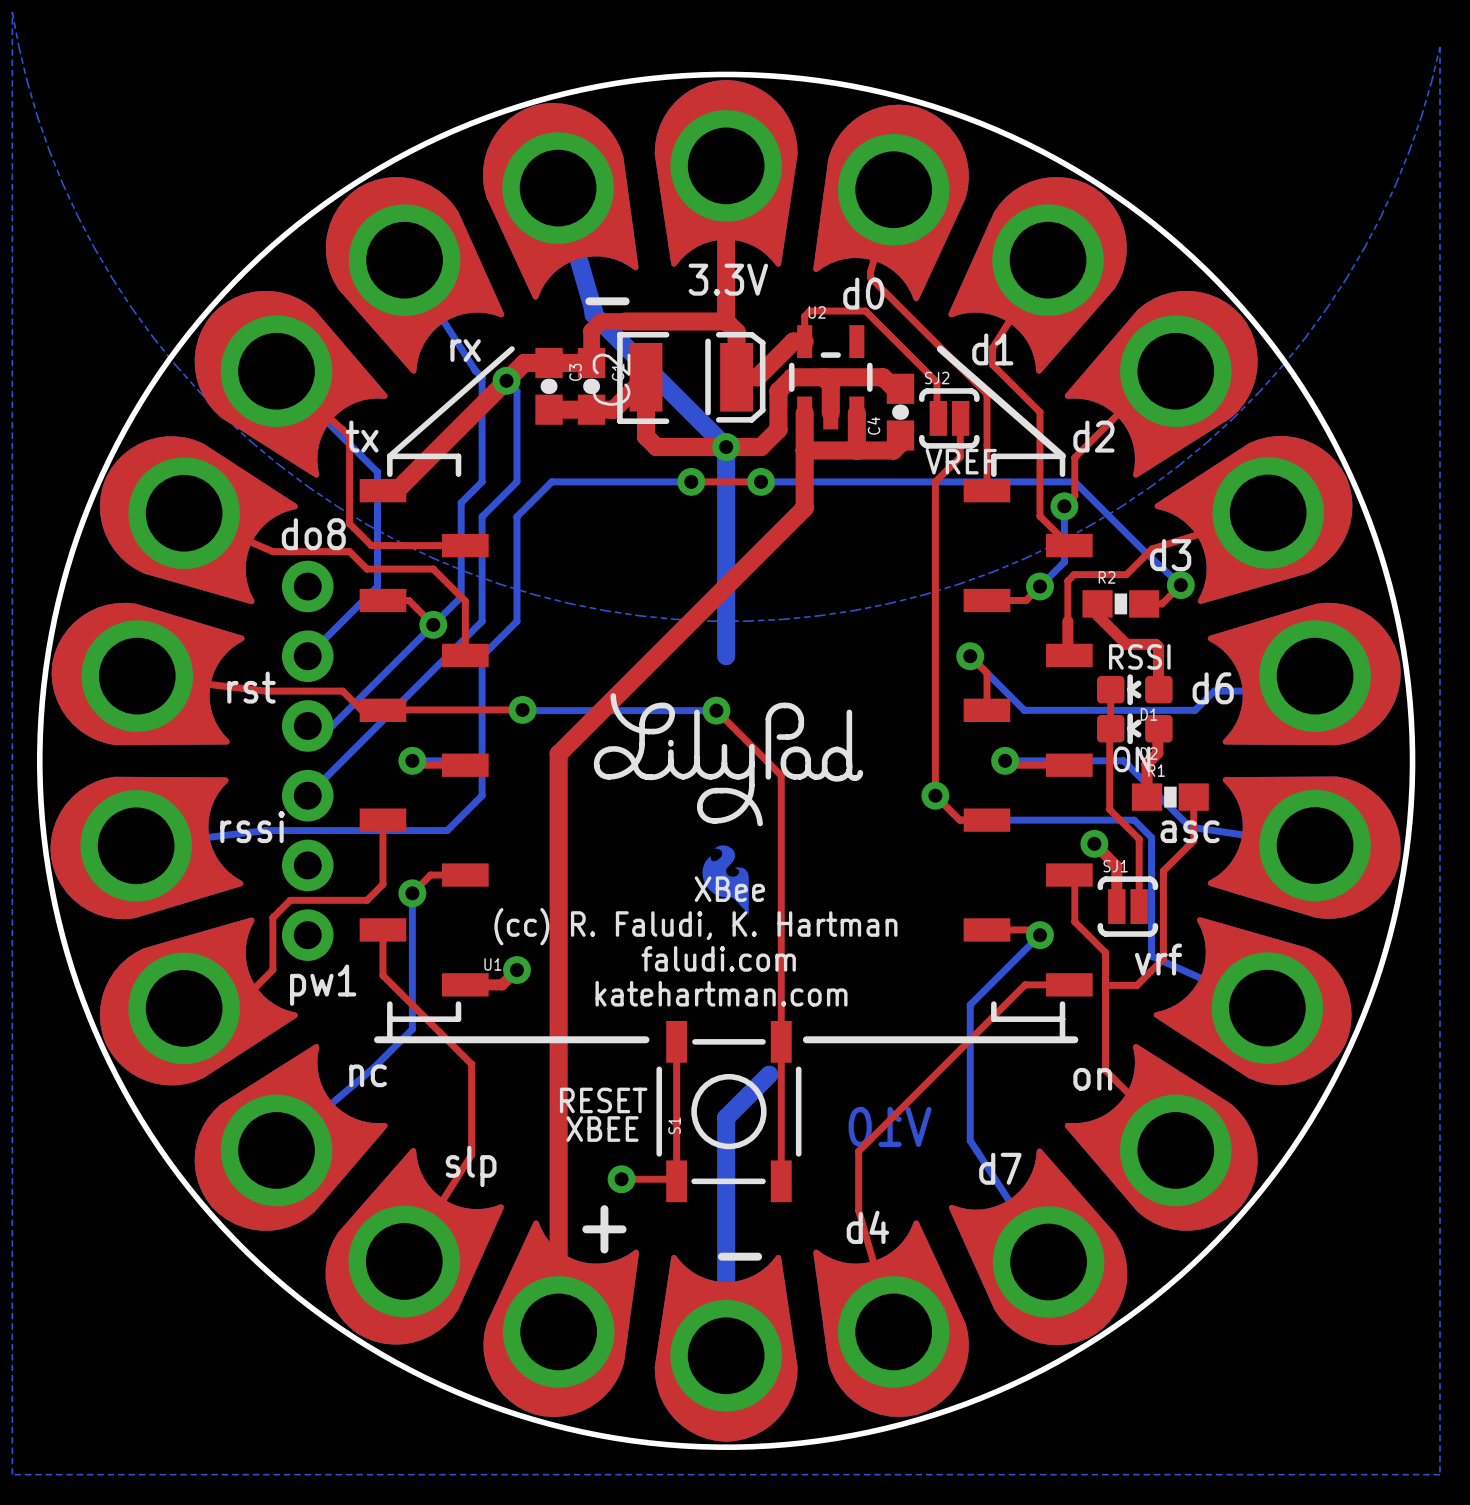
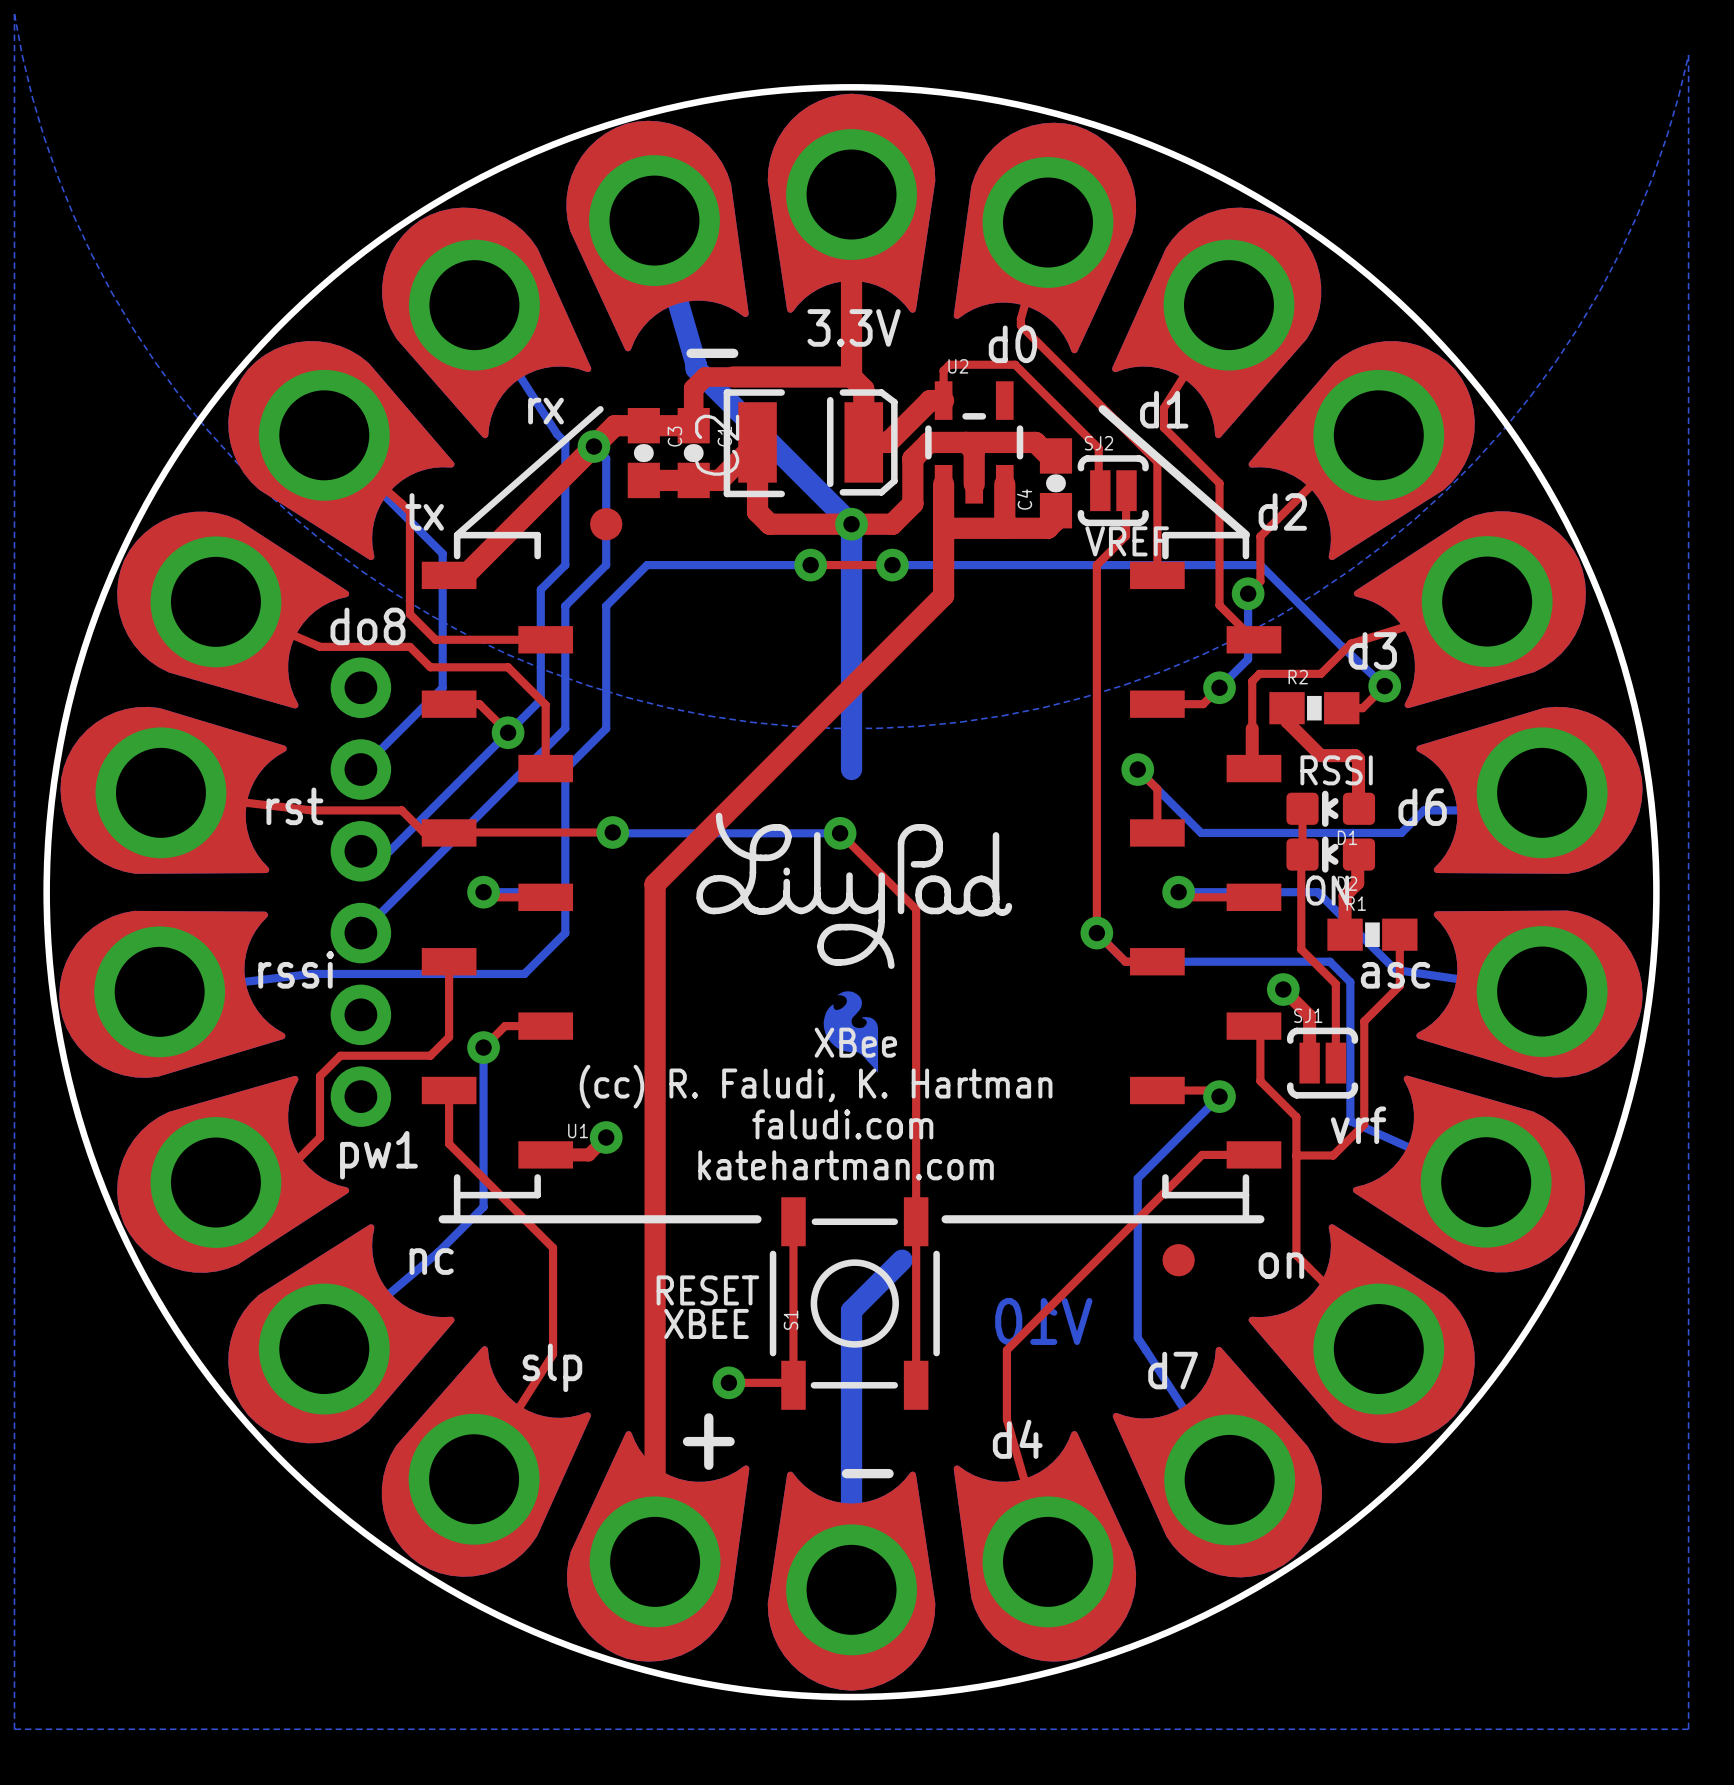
part: none -> (606, 524)
part: none -> (1178, 1260)

